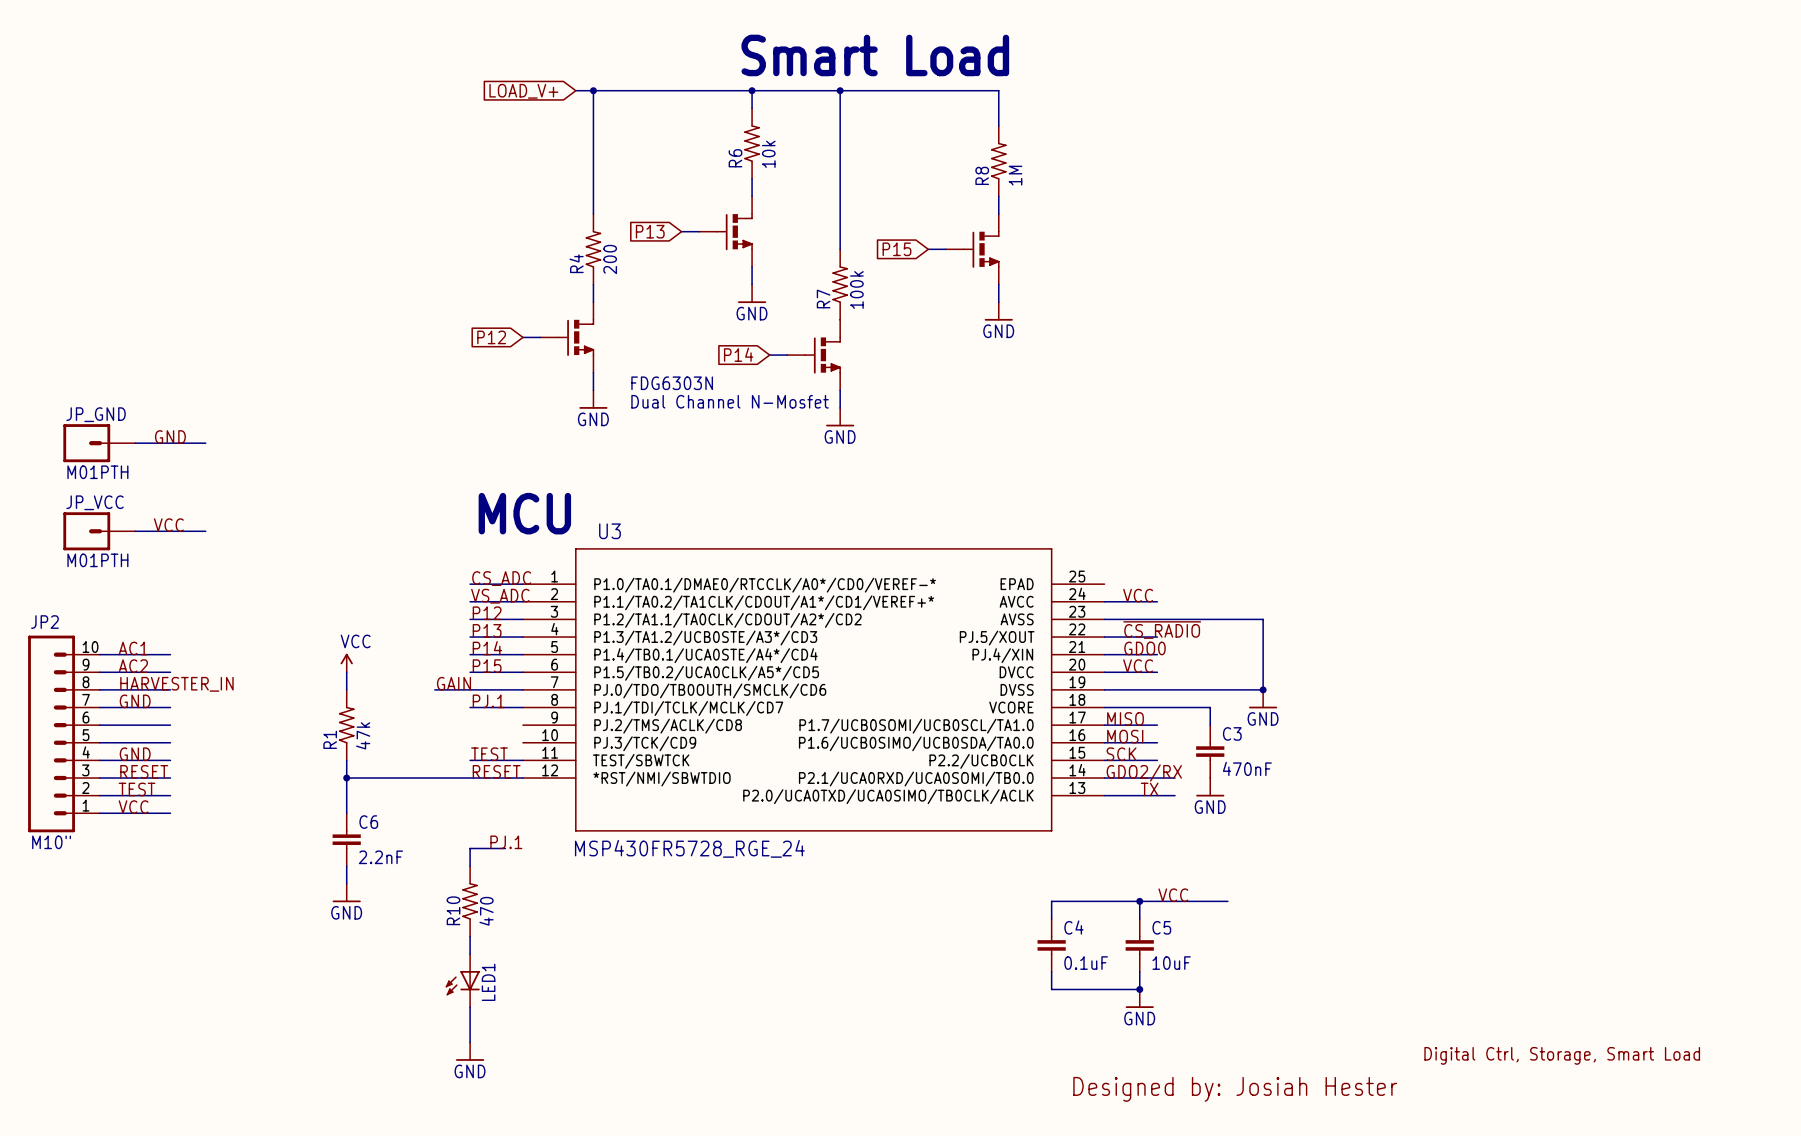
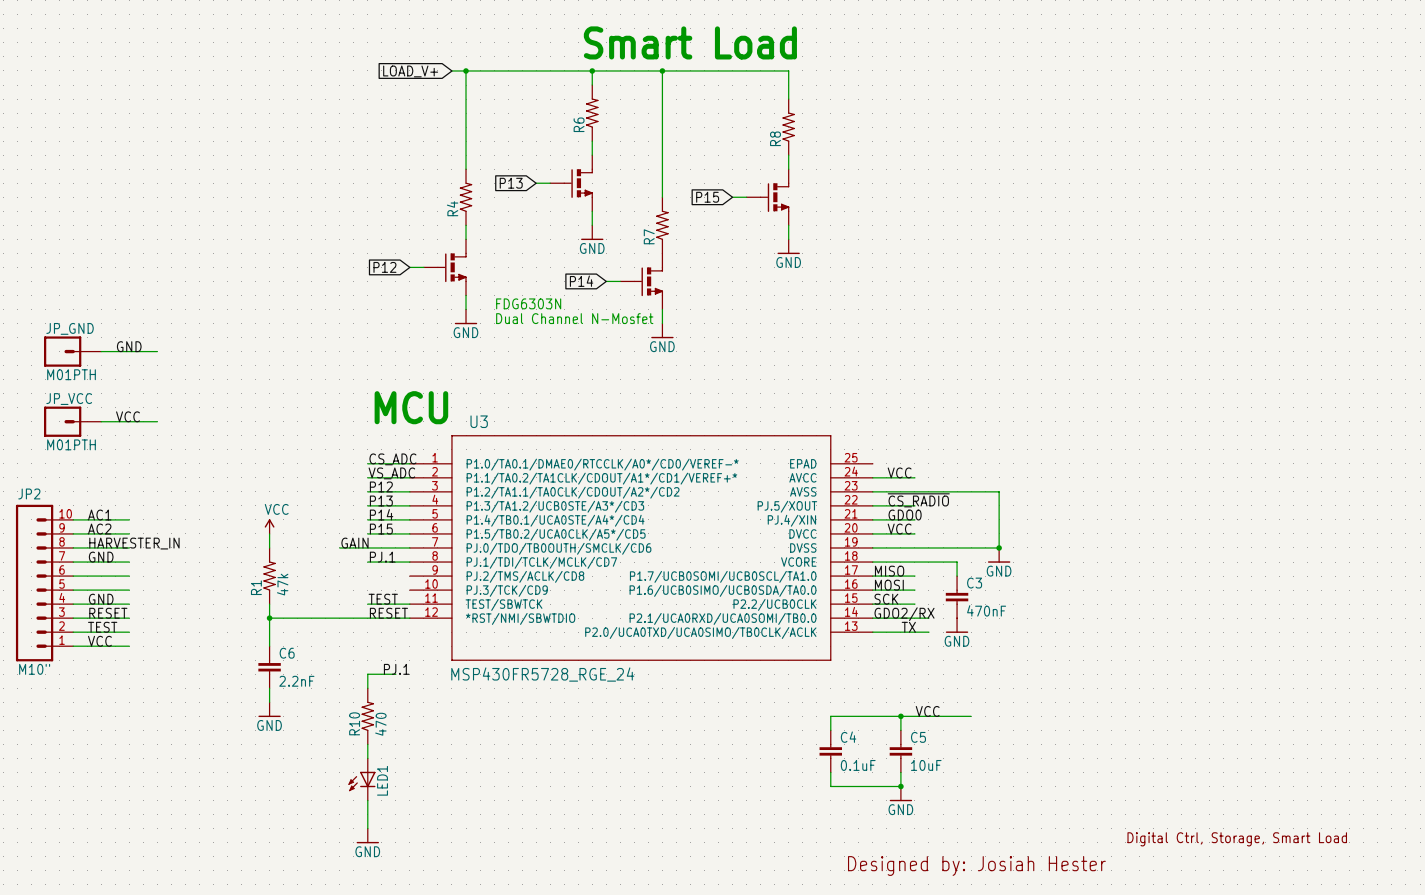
R6 value: 10k (768, 154) -> none
R8 value: 1M (1015, 175) -> none
R4 value: 200 (610, 259) -> none
R7 value: 100k (856, 289) -> none

